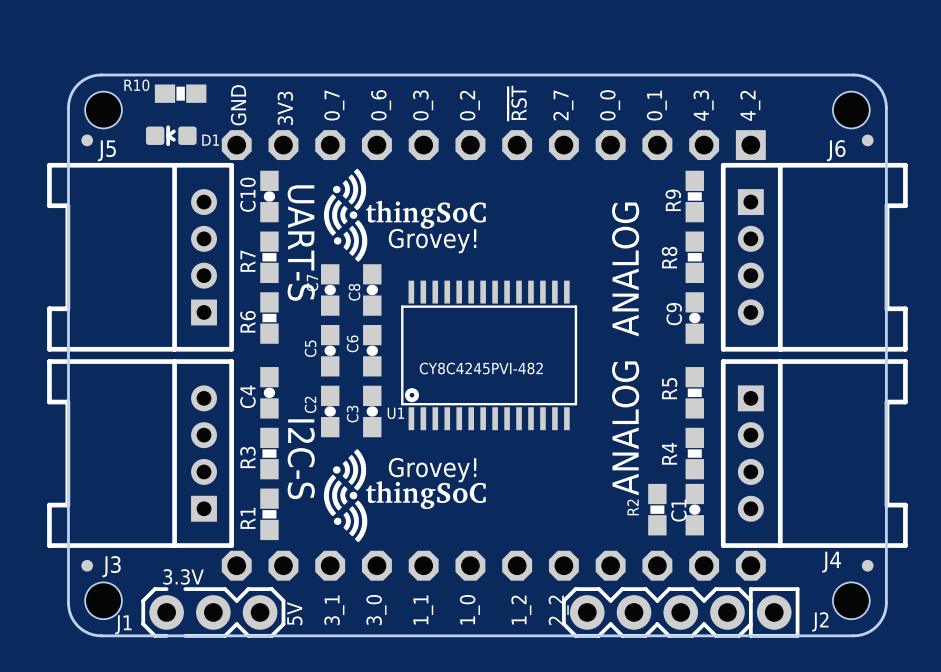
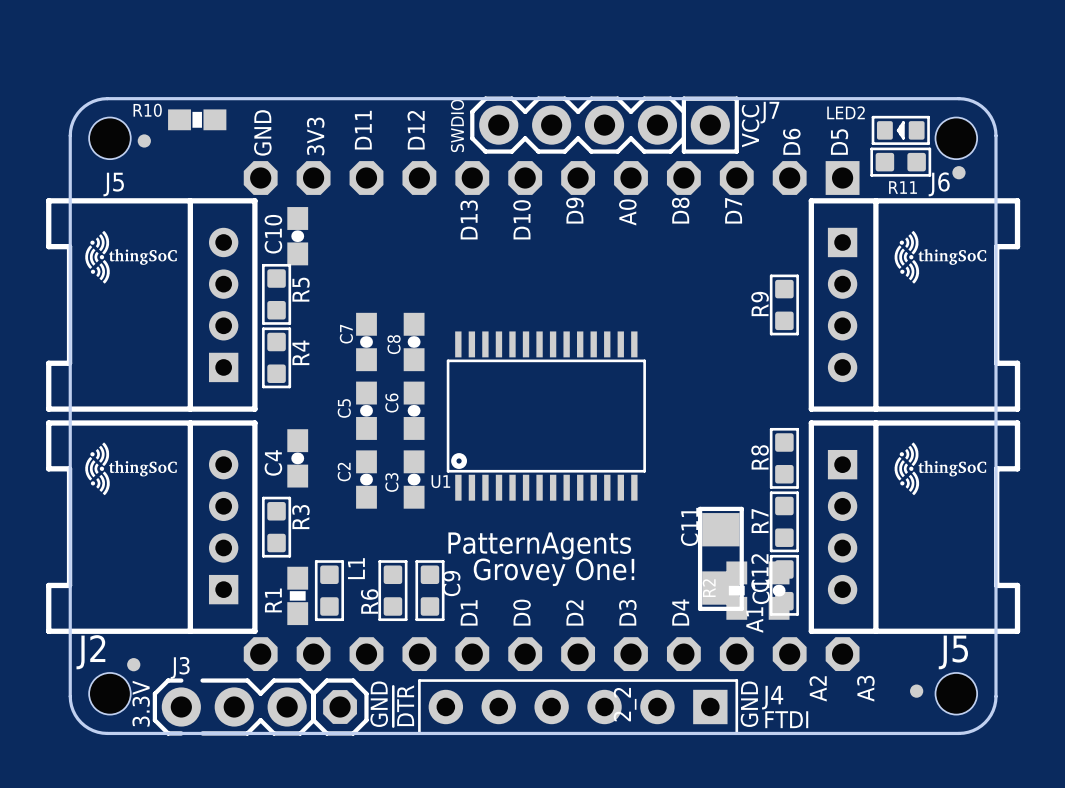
text: none -> SWDIO (457, 125)
J7: none -> (604, 125)
text: none -> VCC (750, 126)
text: ~{RST} (517, 103) -> none
LED2: none -> (900, 130)
text: 0_7 (334, 105) -> D11 (363, 130)
text: 0_6 (381, 105) -> D12 (416, 130)
text: 0_3 (423, 105) -> none
text: 0_2 (469, 105) -> none
text: 2_7 (563, 105) -> none
text: 0_0 (610, 105) -> none
text: 0_1 (656, 105) -> none
text: 4_3 (703, 105) -> D6 (791, 141)
text: 4_2 (750, 105) -> D5 (839, 142)
R11: none -> (900, 162)
D1: (171, 135) -> none
part position: (87, 140) -> (144, 140)
part position: (867, 140) -> (958, 172)
drawing: [324, 168, 486, 262] -> none
R9 footprint: [685, 170, 704, 223] -> [769, 274, 799, 336]
text: none -> D9 (574, 210)
text: none -> D8 (680, 210)
text: none -> D7 (733, 210)
text: none -> A0 (627, 212)
text: none -> D13 (469, 219)
text: none -> D10 (522, 219)
drawing: none -> [85, 230, 177, 284]
drawing: none -> [894, 230, 987, 284]
R7 footprint: [260, 231, 279, 284] -> [769, 491, 799, 553]
R8 footprint: [685, 231, 704, 284] -> [769, 427, 799, 489]
text: Grovey! (432, 241) -> none
text: UART-S (301, 243) -> none
text: ANALOG (625, 269) -> none
R6 footprint: [260, 292, 279, 344] -> [378, 560, 408, 622]
C9 footprint: [685, 292, 704, 344] -> [415, 560, 445, 622]
C9 name position: C9 (674, 314) -> C9 (451, 583)
R5 footprint: [685, 367, 704, 419] -> [262, 263, 292, 325]
text: CY8C4245PVI-482 (481, 368) -> none
drawing: none -> [85, 442, 177, 496]
drawing: none -> [894, 442, 987, 496]
R5 name position: R5 (669, 388) -> R5 (301, 289)
R3 footprint: [260, 427, 279, 480] -> [262, 496, 292, 558]
R4 footprint: [685, 427, 704, 480] -> [262, 327, 292, 389]
text: ANALOG (625, 428) -> none
drawing: [324, 449, 486, 543] -> none
R4 name position: R4 (669, 453) -> R4 (300, 352)
R3 name position: R3 (247, 457) -> R3 (300, 517)
text: I2C-S (301, 459) -> none
text: Grovey! (432, 470) -> Grovey One! (554, 572)
text: none -> PatternAgents (539, 546)
C11: none -> (720, 558)
C12: none -> (784, 585)
L1: none -> (329, 590)
text: none -> D4 (680, 612)
text: none -> D1 (469, 612)
text: none -> D0 (522, 612)
text: none -> D2 (574, 612)
text: none -> D3 (627, 612)
text: none -> A1 (754, 620)
J4 name: J4 (831, 562) -> J5 (953, 652)
part position: (87, 565) -> (133, 664)
part position: (867, 565) -> (916, 691)
J3 name: J3 (111, 566) -> J2 (90, 652)
text rotation: 0° (183, 576) -> 90° counterclockwise (141, 703)
text position: 3.3V (183, 576) -> 3.3V (141, 703)
text: none -> A2 (818, 688)
text: none -> A3 (865, 688)
text: 1_1 (423, 609) -> none
text: 1_0 (469, 609) -> none
text: 3_1 (334, 610) -> GND (379, 704)
text: 3_0 (376, 610) -> ~{DTR} (403, 706)
text: 1_2 (521, 610) -> none
text: none -> GND (749, 704)
part: none -> (340, 707)
J4: none -> (578, 707)
part: (680, 612) -> none
text: 5V (294, 613) -> none
text: J2 (820, 621) -> none
text: none -> FTDI (786, 719)
J1 name: J1 (123, 624) -> J3 (180, 667)

